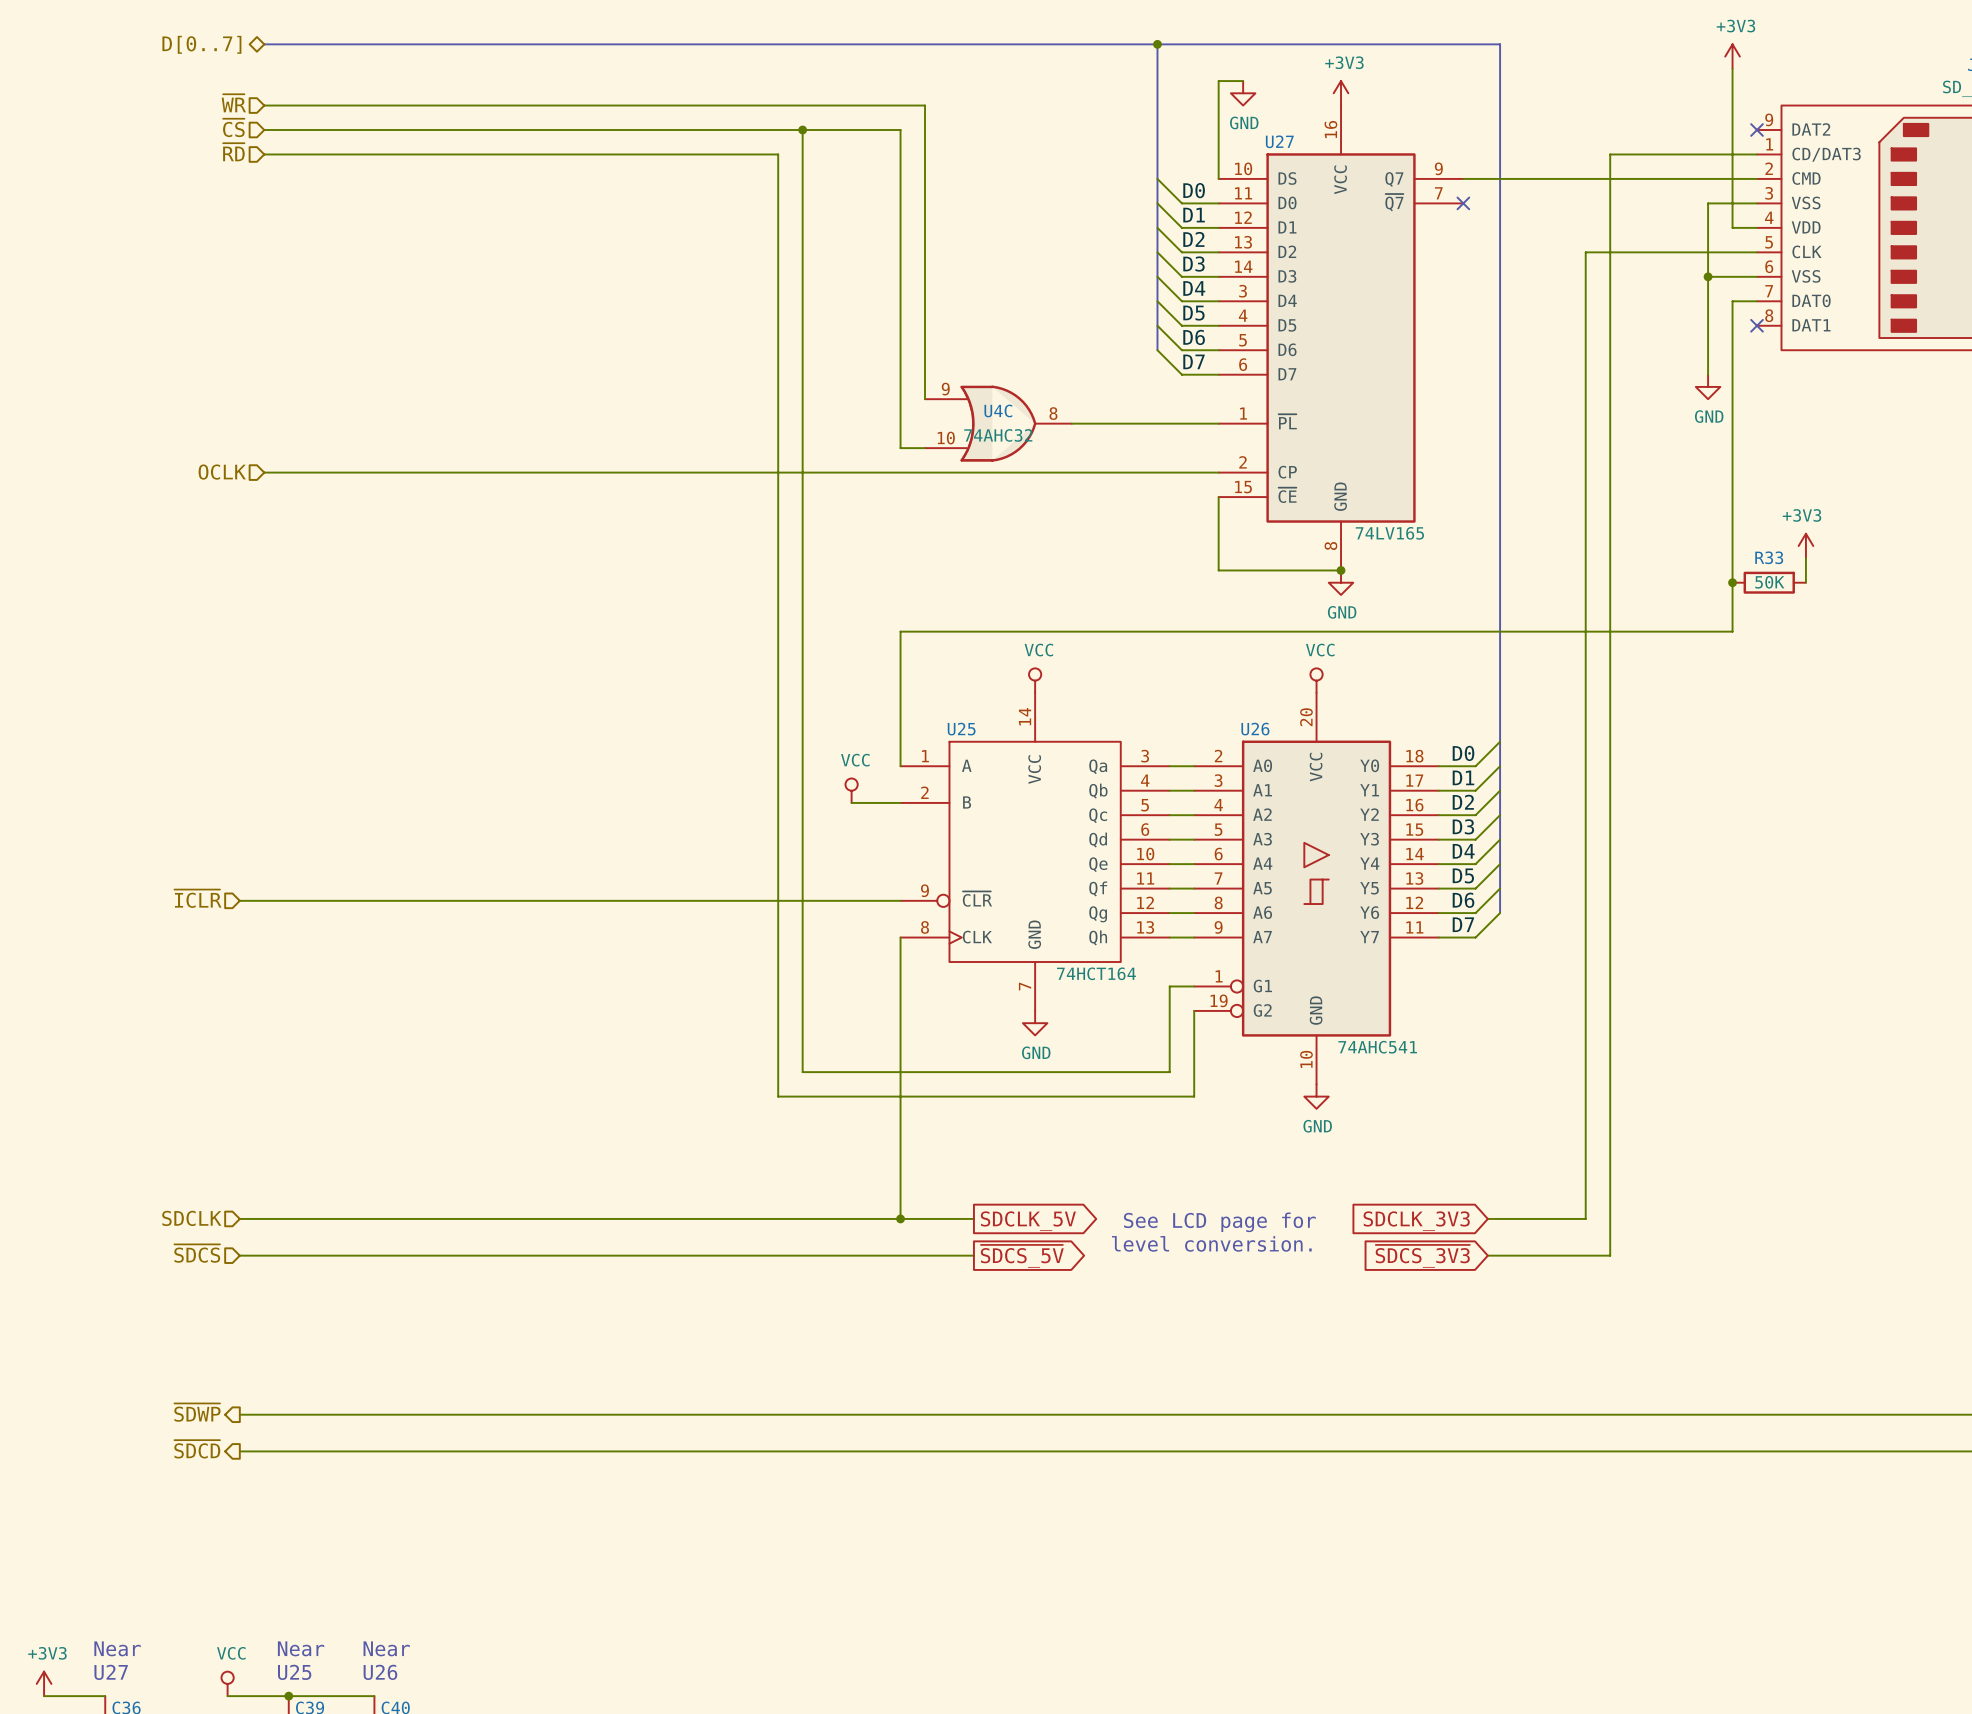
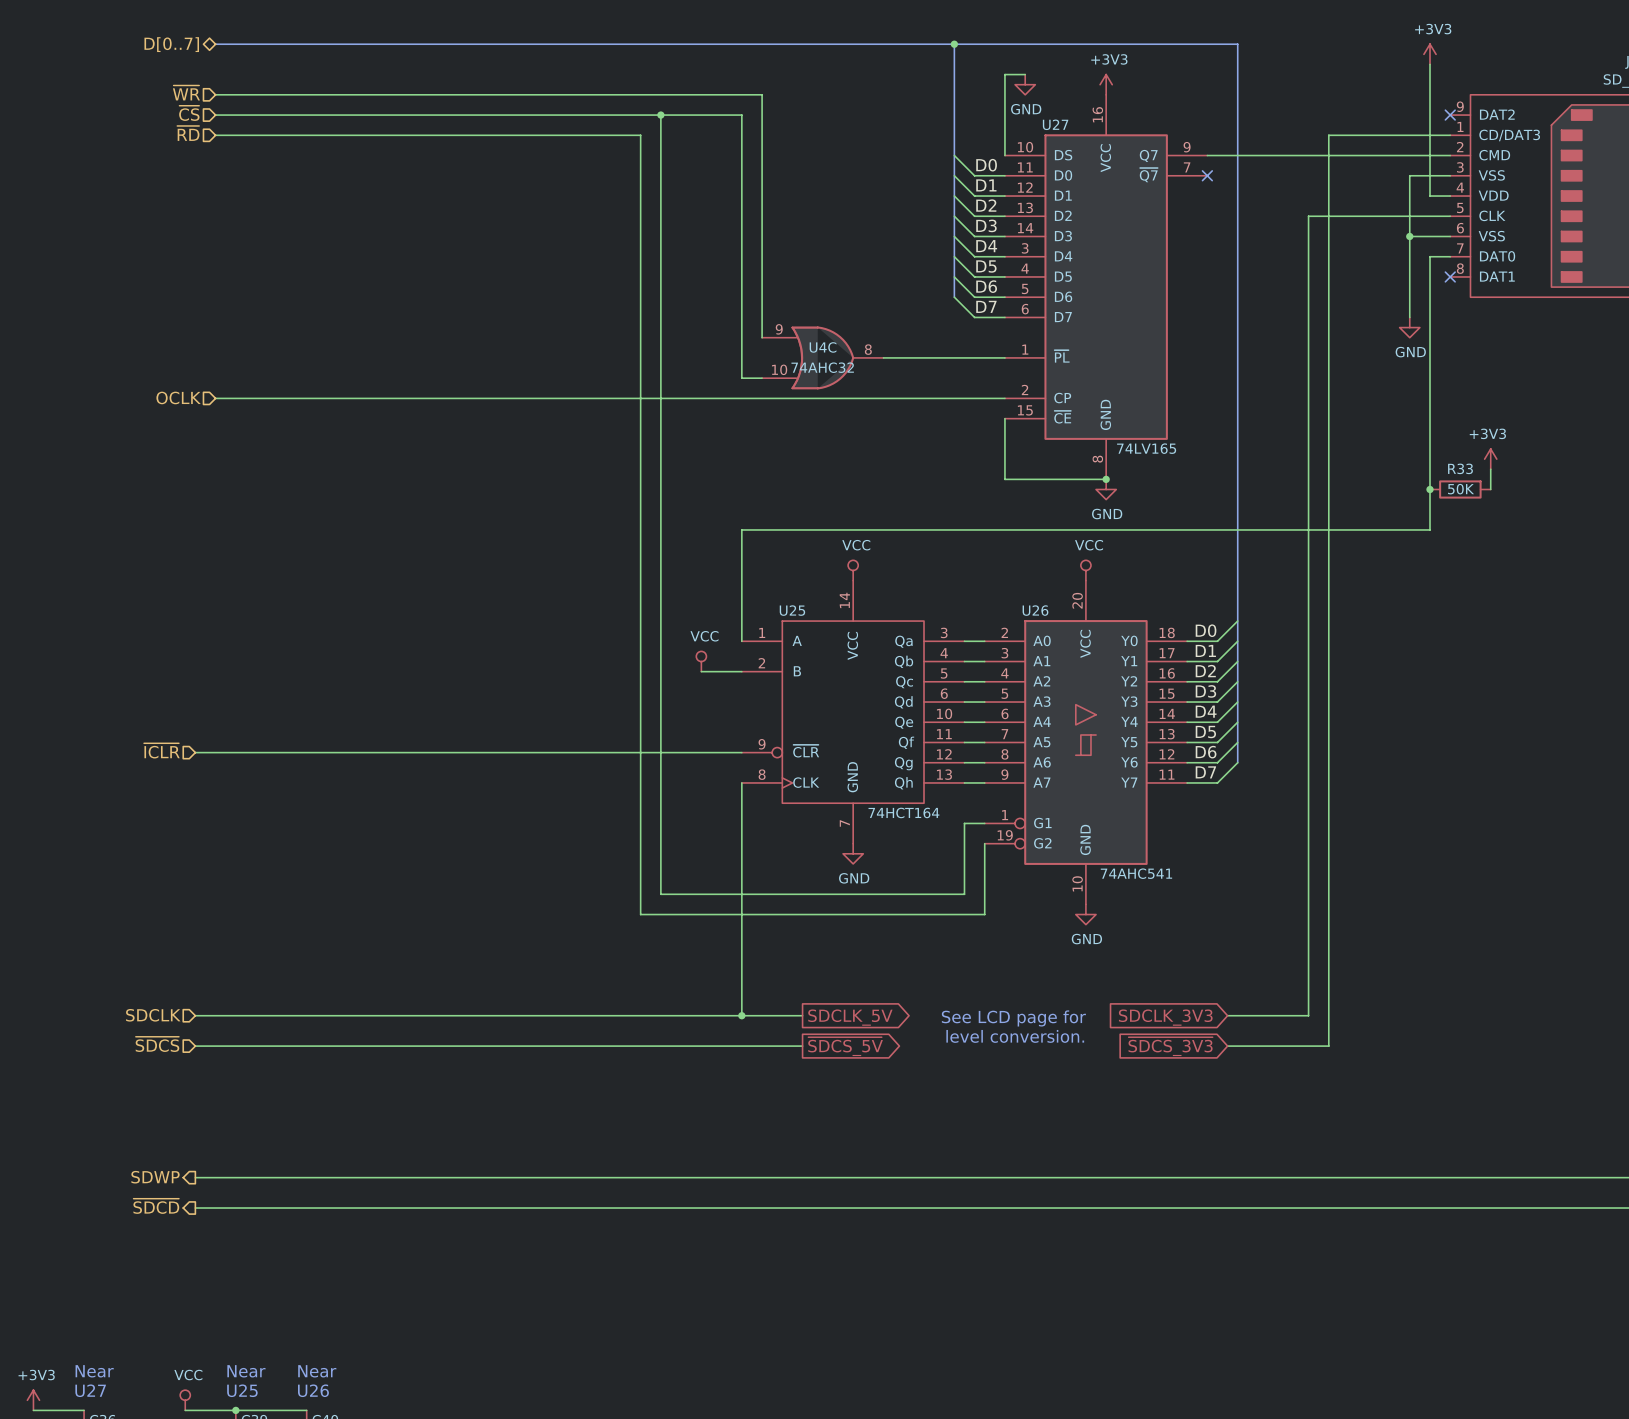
hierarchical label: ~{SDWP} (197, 1412) -> SDWP (155, 1177)

